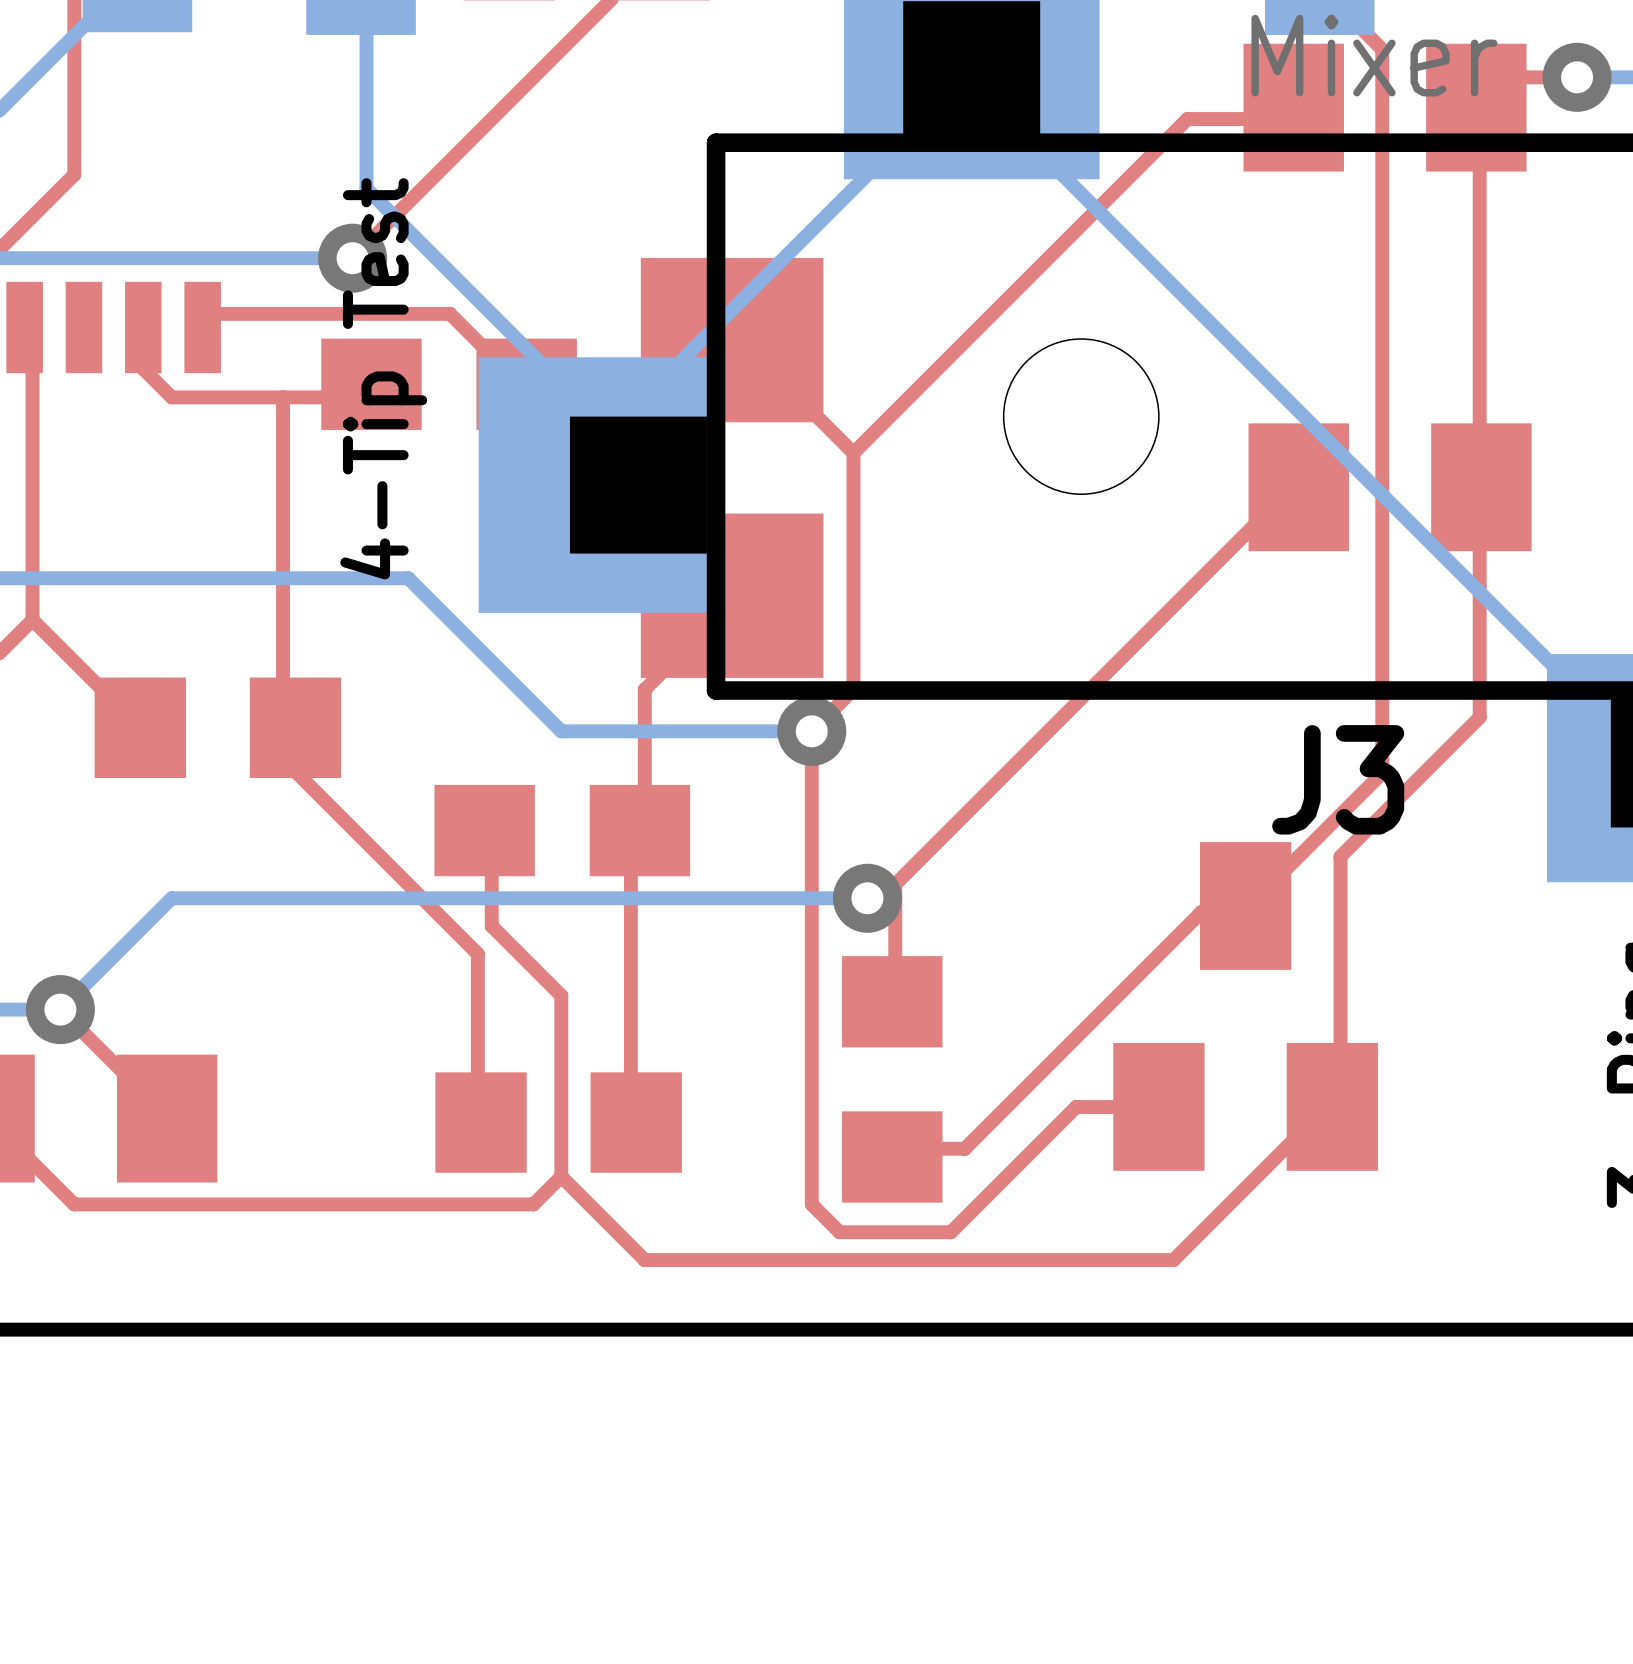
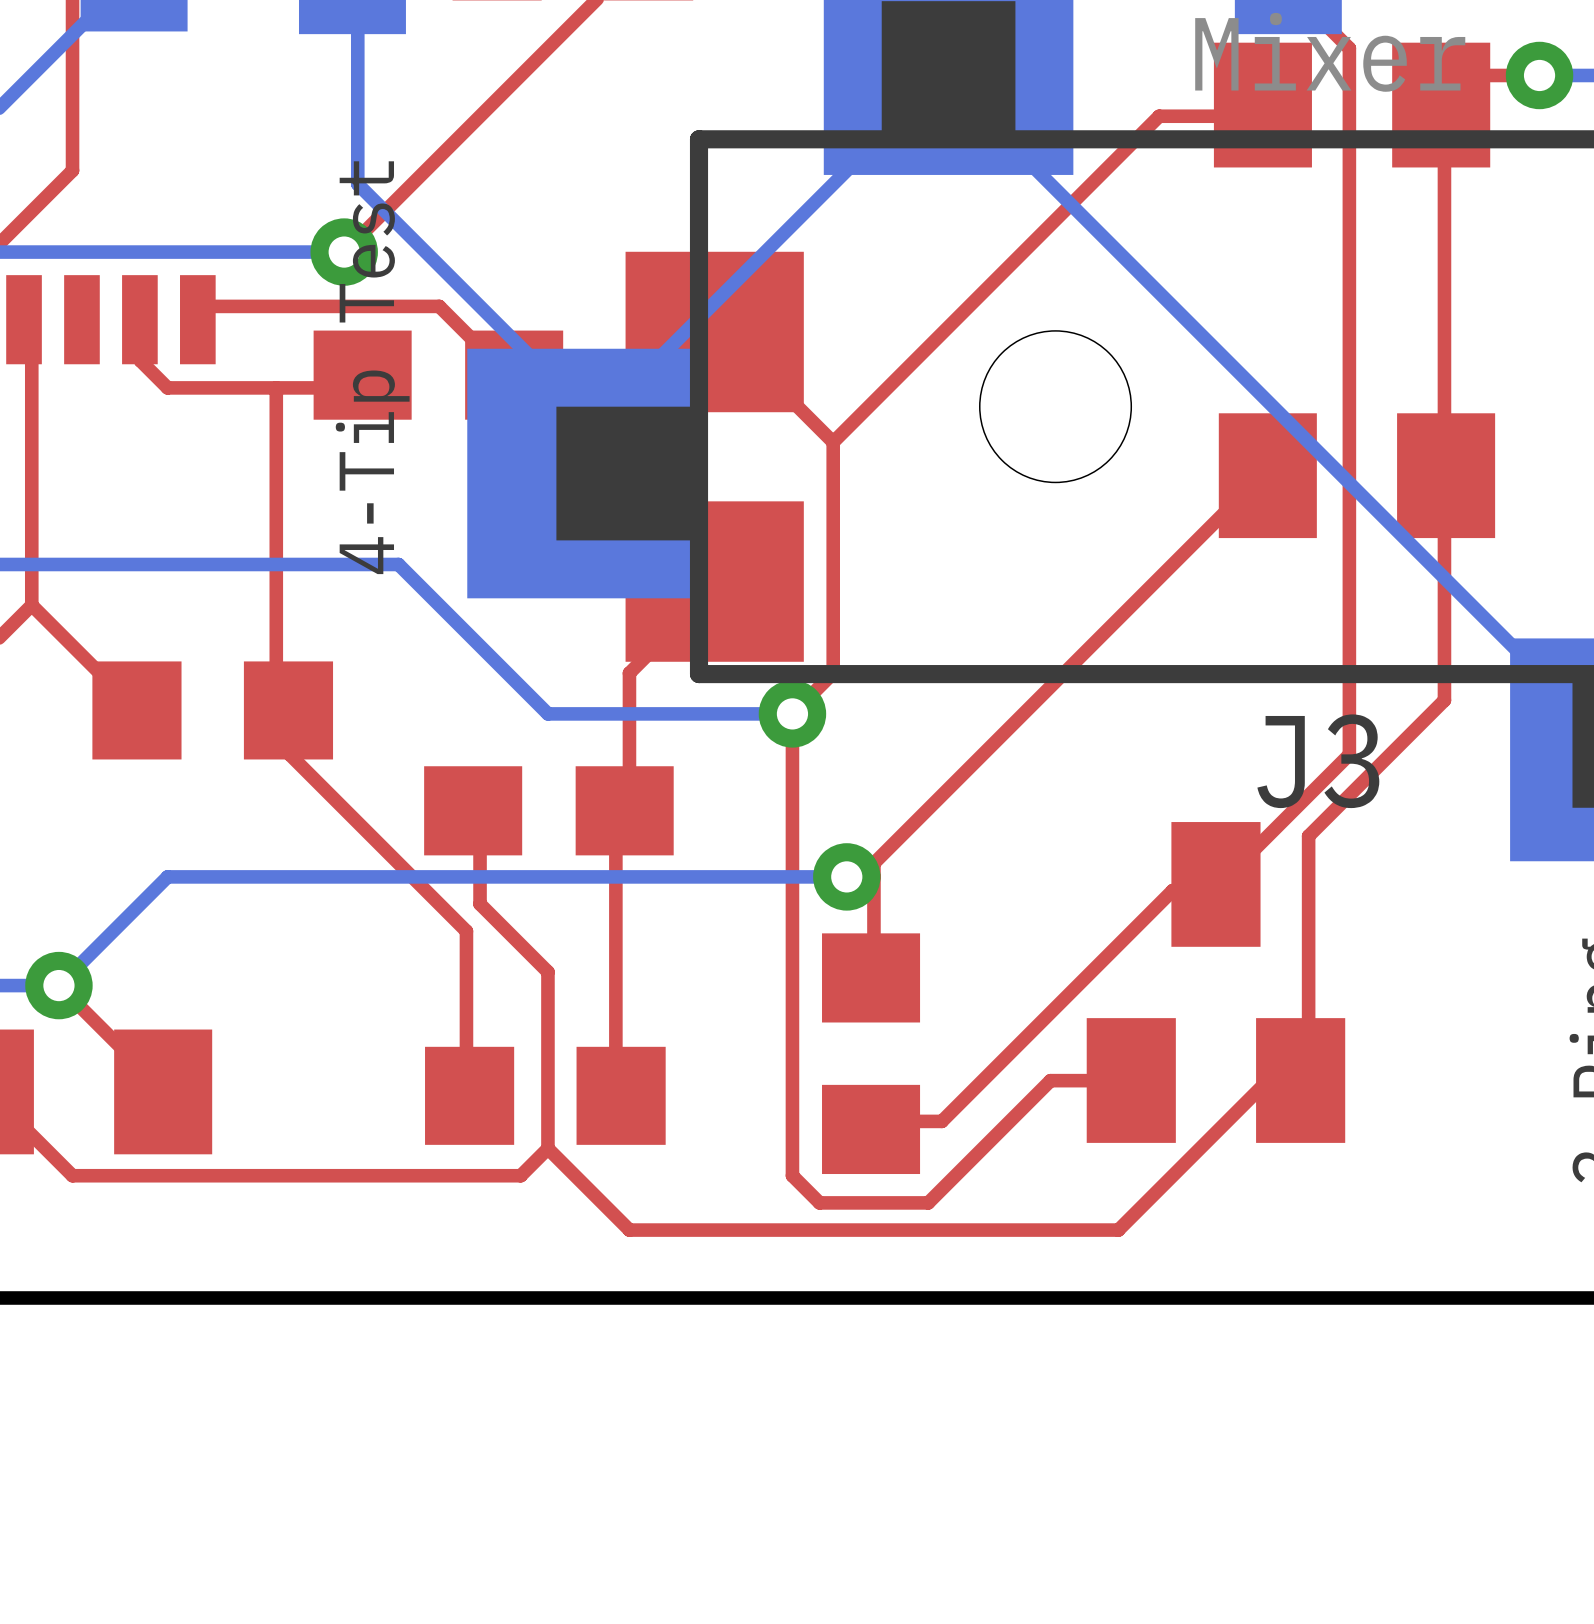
top track: (1326, 1107) (1173, 1260) (1145, 1260) -> (1295, 1080) (1267, 1080) (1118, 1230)

